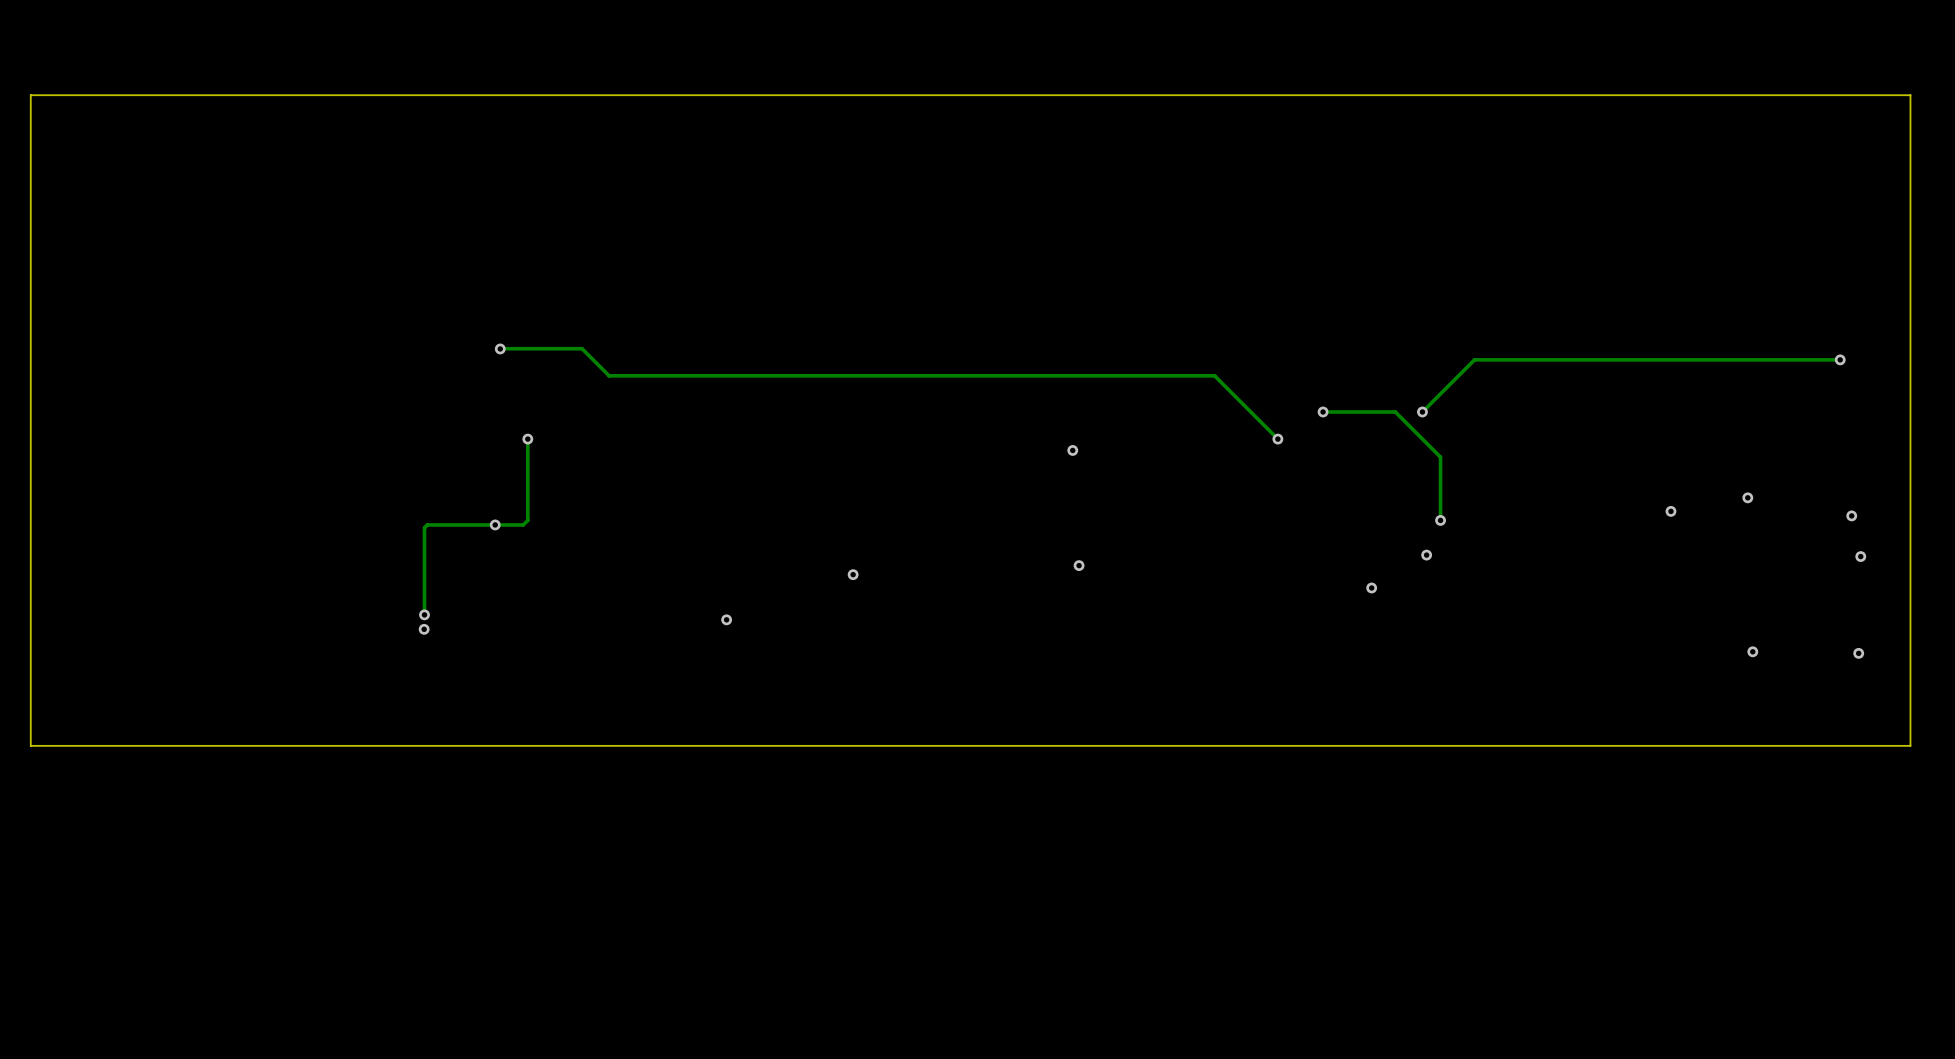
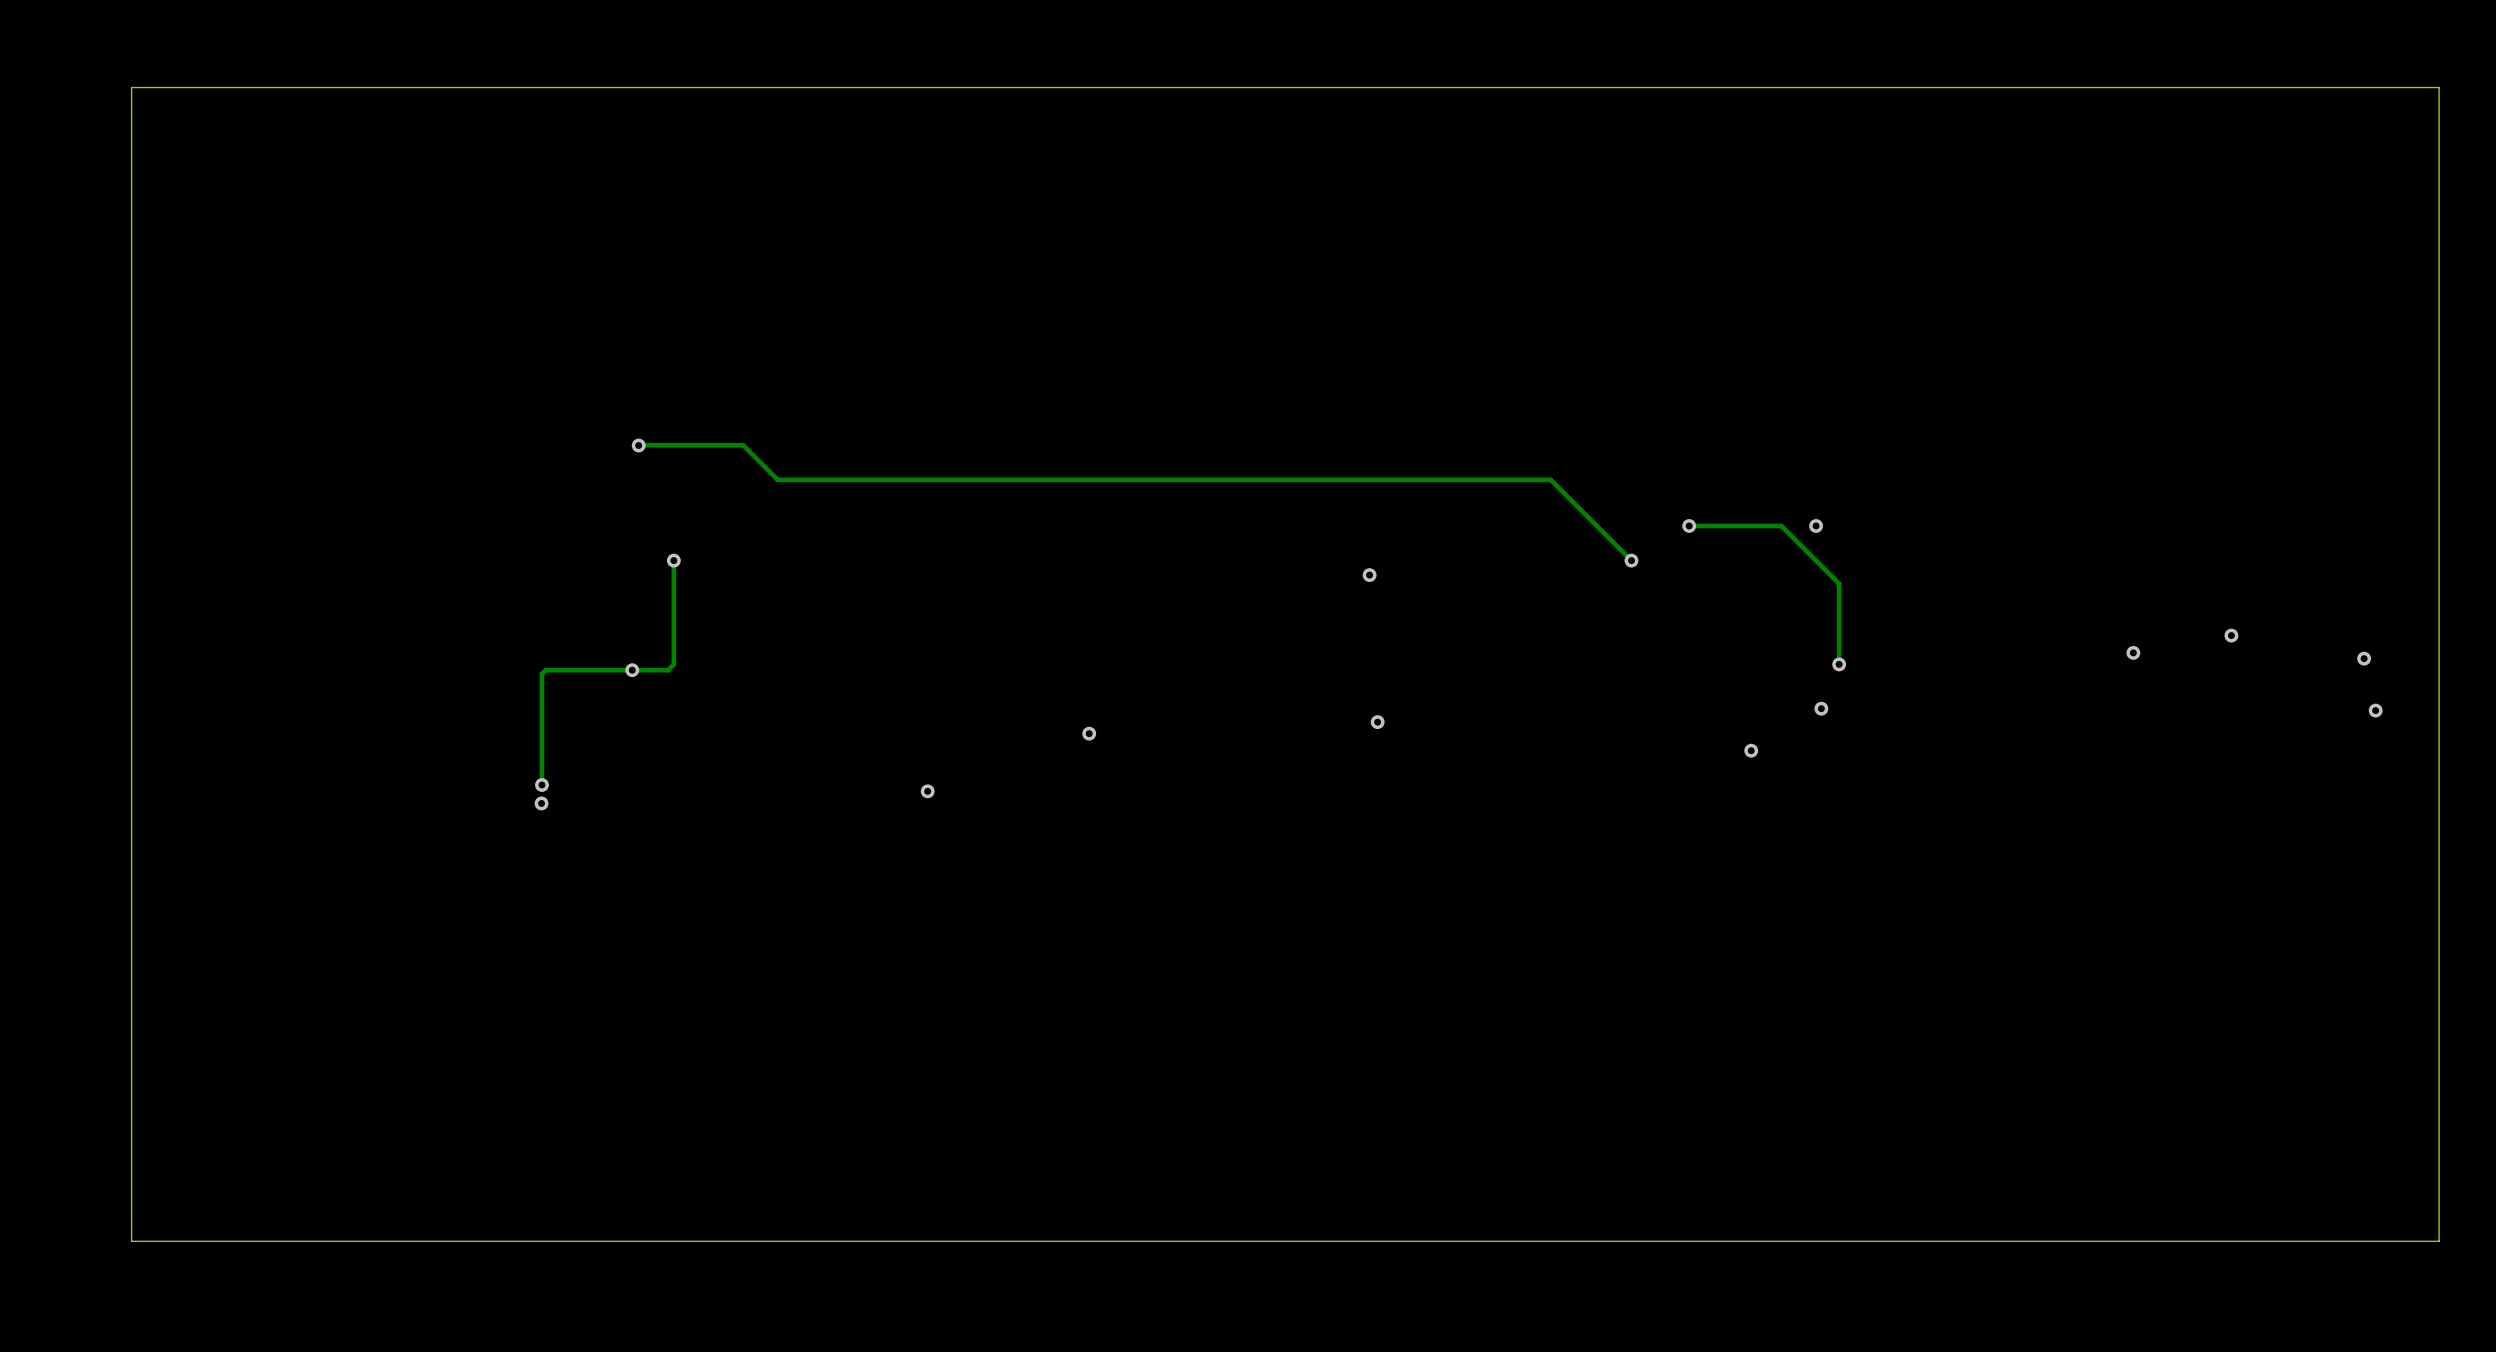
board edge: (1910, 95) (30, 95) (30, 745) (1910, 745) -> (2439, 121) (2439, 87) (131, 87) (131, 1241) (2439, 1241) (2439, 952)
track: (1840, 359) (1474, 359) (1422, 411) -> none
via: (1840, 359) -> none
via: (1752, 651) -> none
via: (1858, 653) -> none

